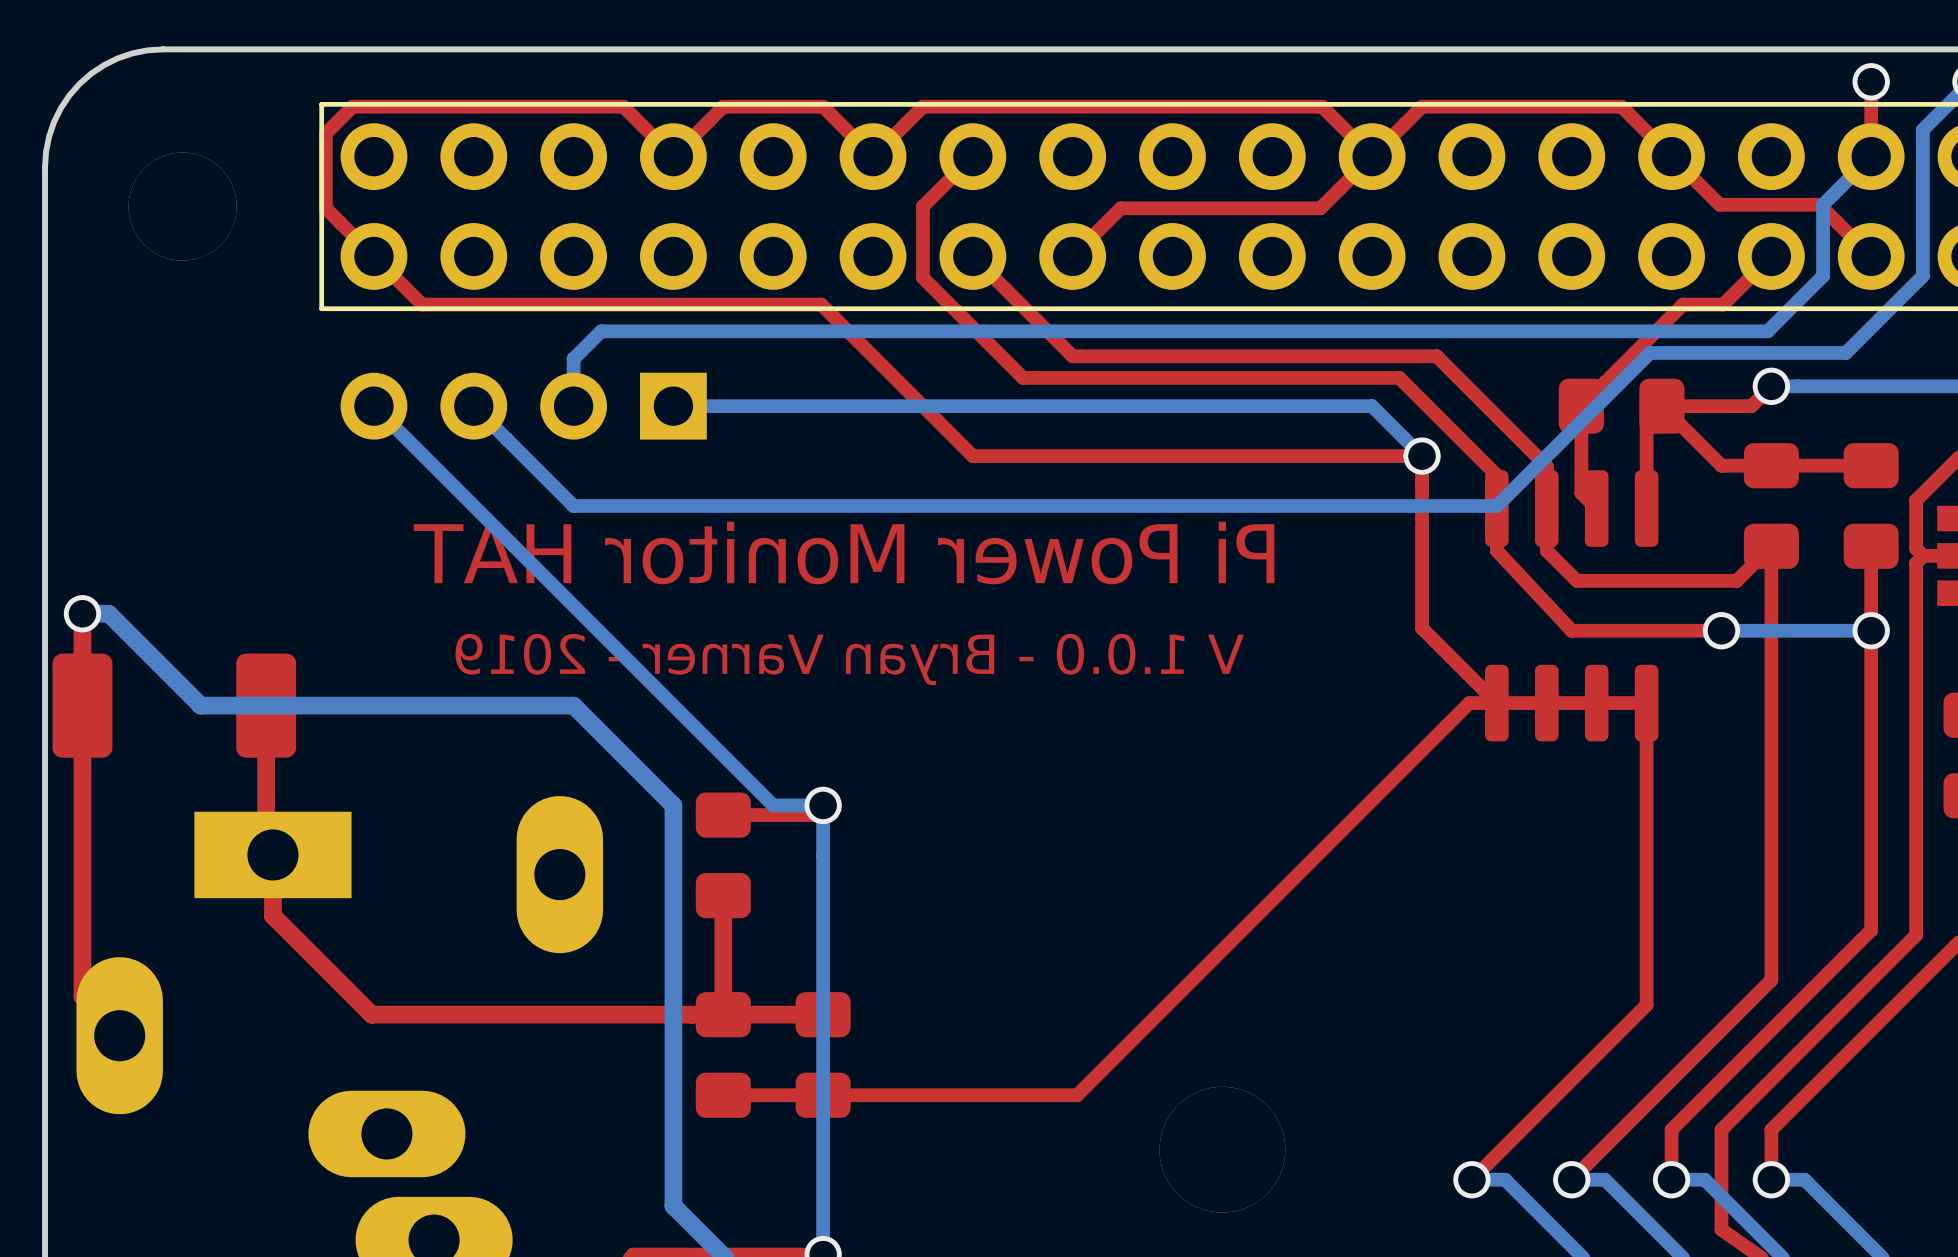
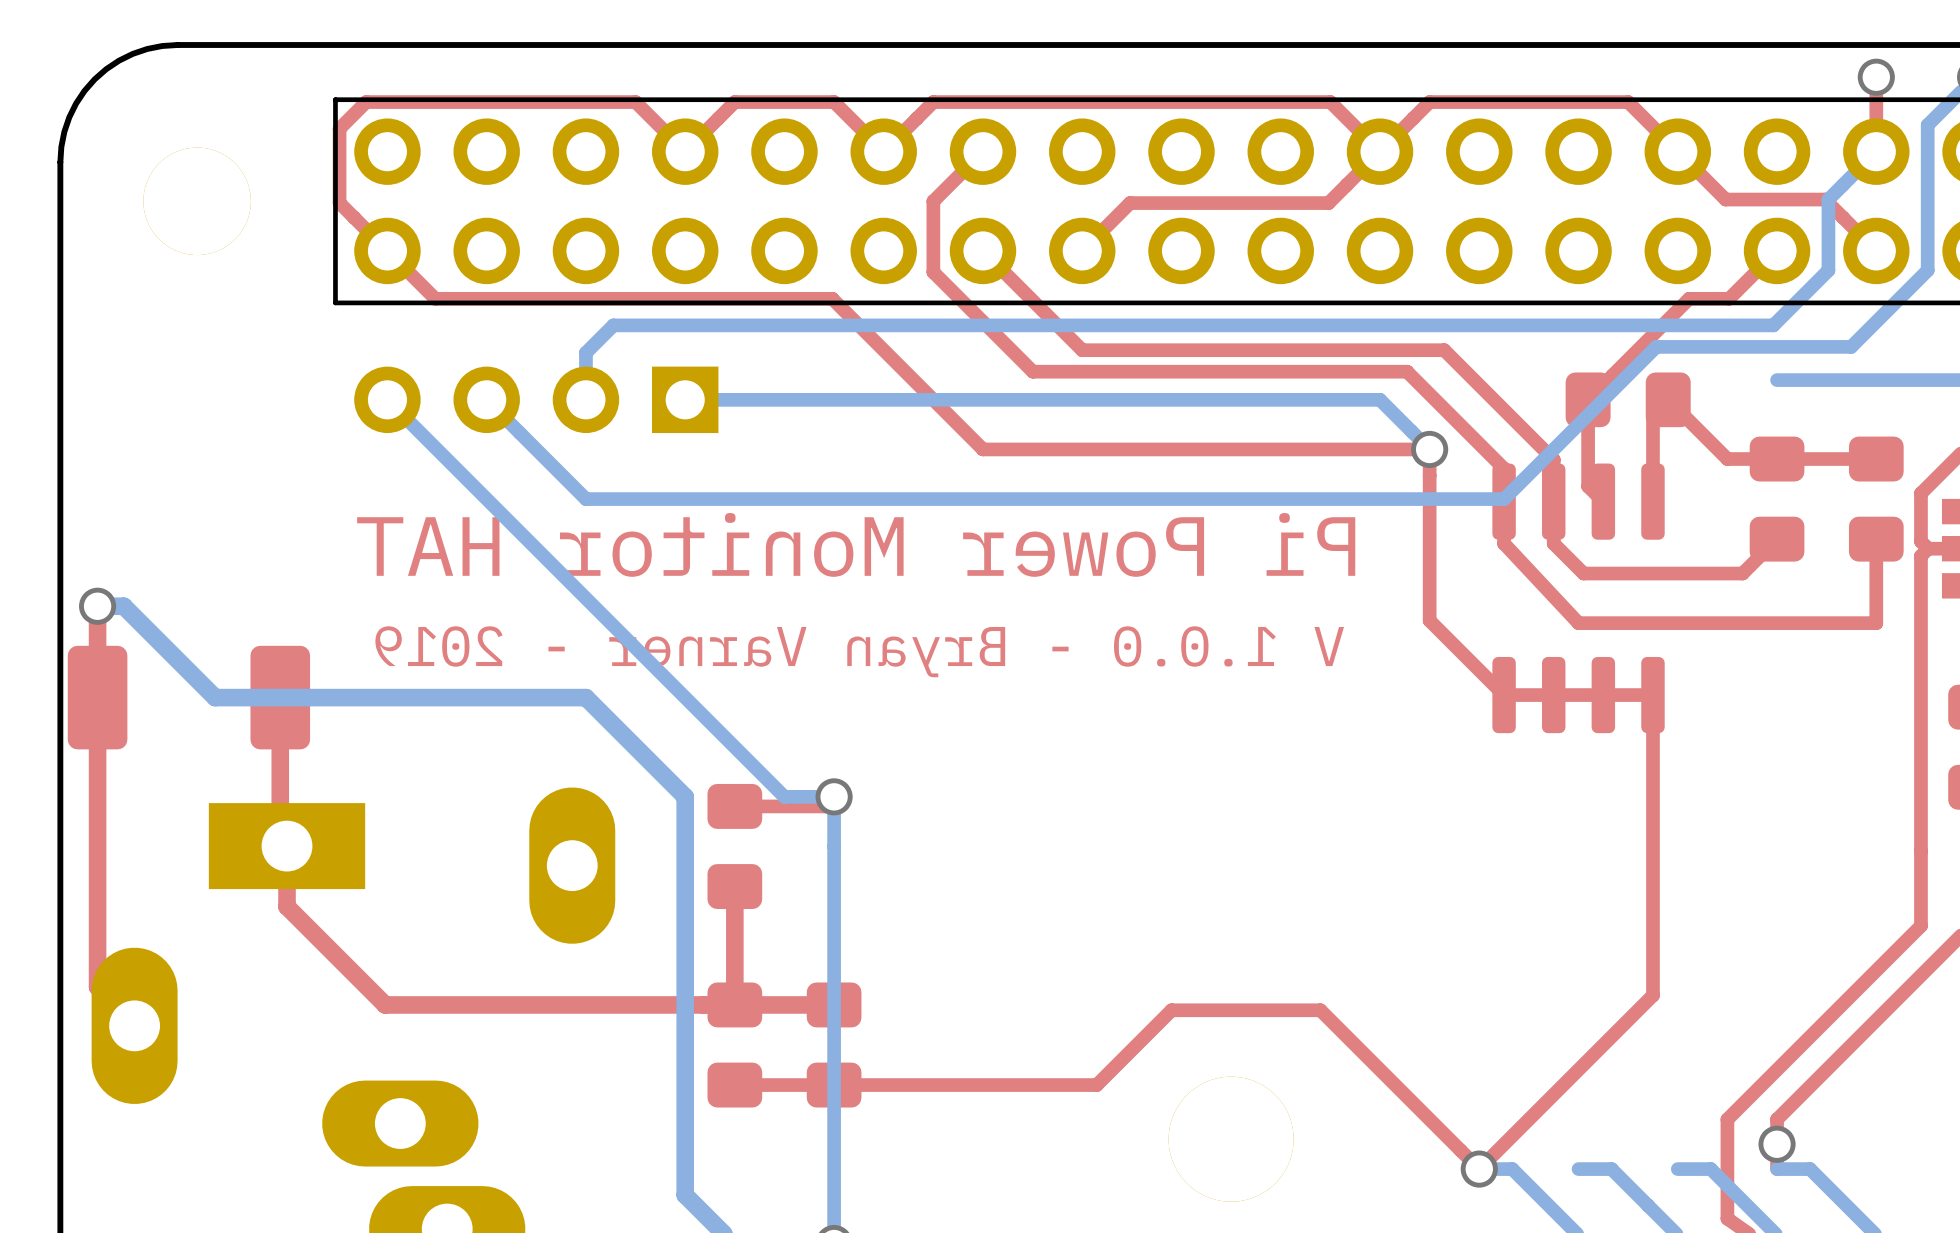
top track: (1771, 386) (1751, 406) (1661, 406) -> none
via: (1771, 386) -> none
top track: (1771, 546) (1771, 980) (1571, 1179) -> none
via: (1721, 630) -> none
top track: (1871, 630) (1871, 930) (1671, 1129) (1671, 1179) -> (1876, 623) (1727, 623)
bottom track: (1871, 630) (1721, 630) -> none
via: (1871, 630) -> none
top track: (1496, 703) (1469, 703) (1077, 1095) -> (1479, 1169) (1320, 1010) (1171, 1010) (1096, 1085) (1086, 1085)
via: (1571, 1179) -> none
via: (1671, 1179) -> none
via position: (1771, 1179) -> (1777, 1144)

